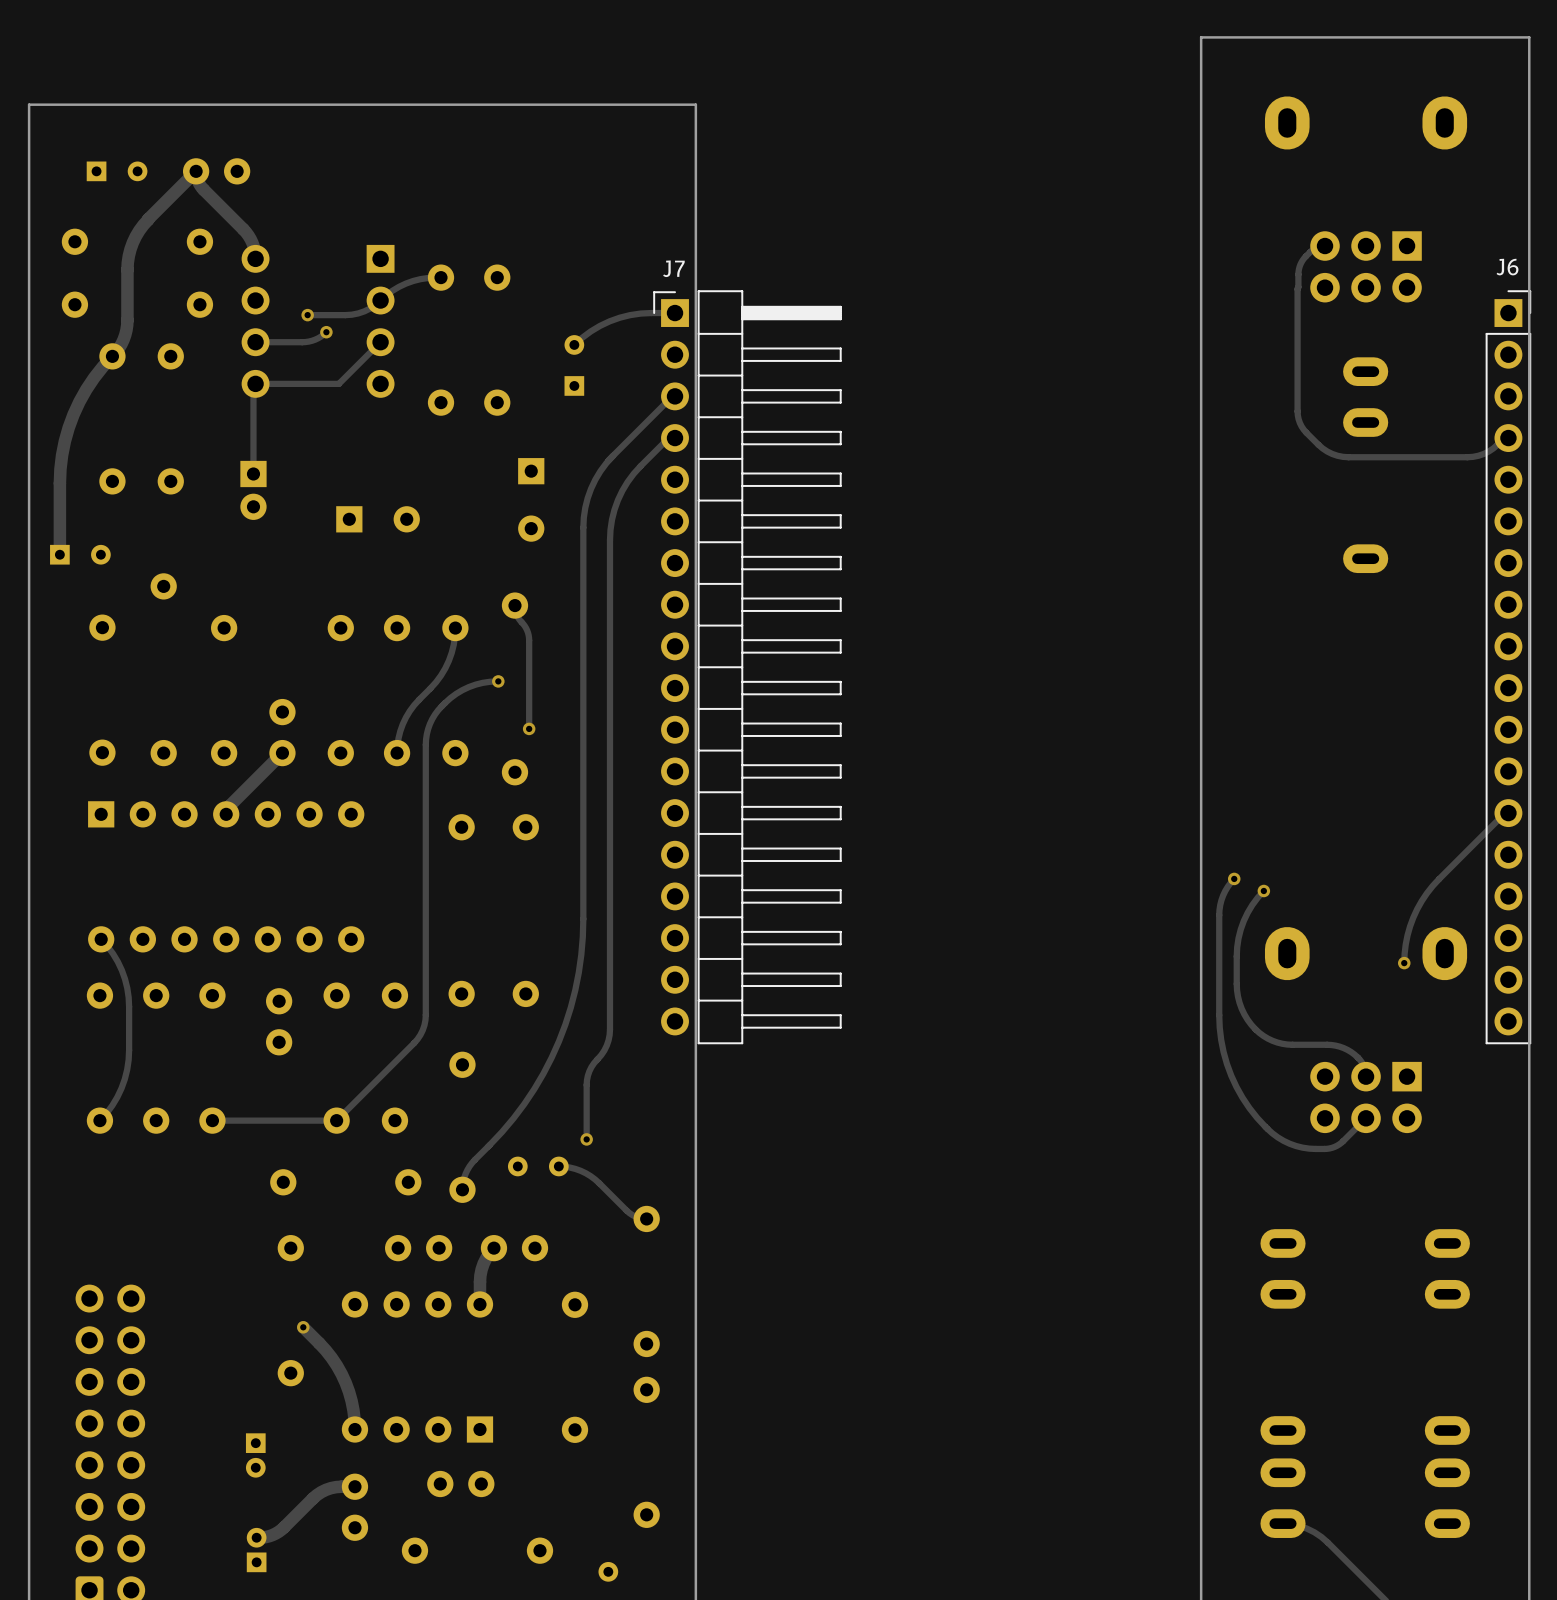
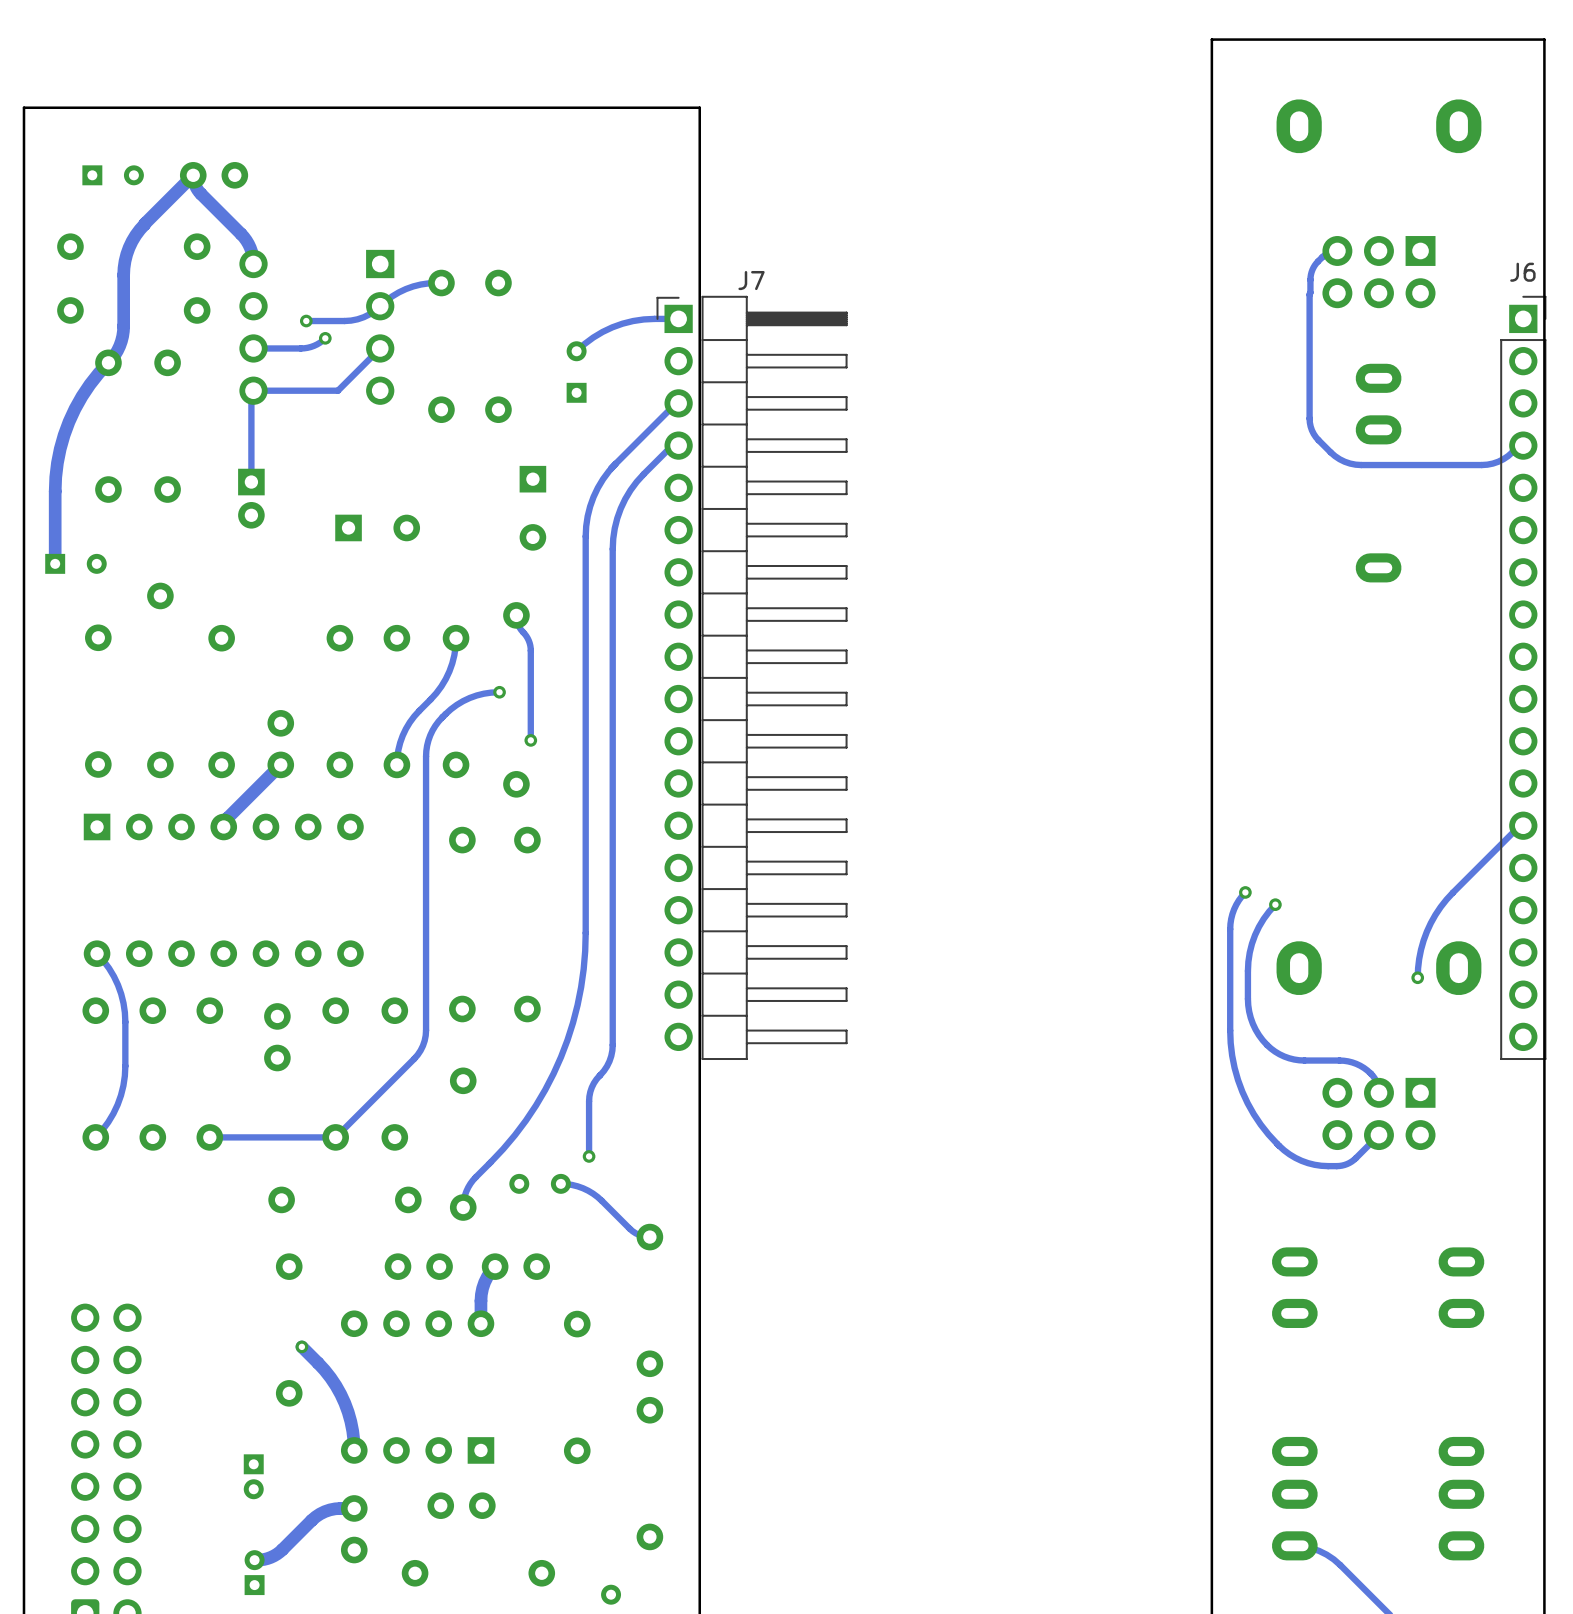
J7 name position: J7 (673, 268) -> J7 (751, 280)

